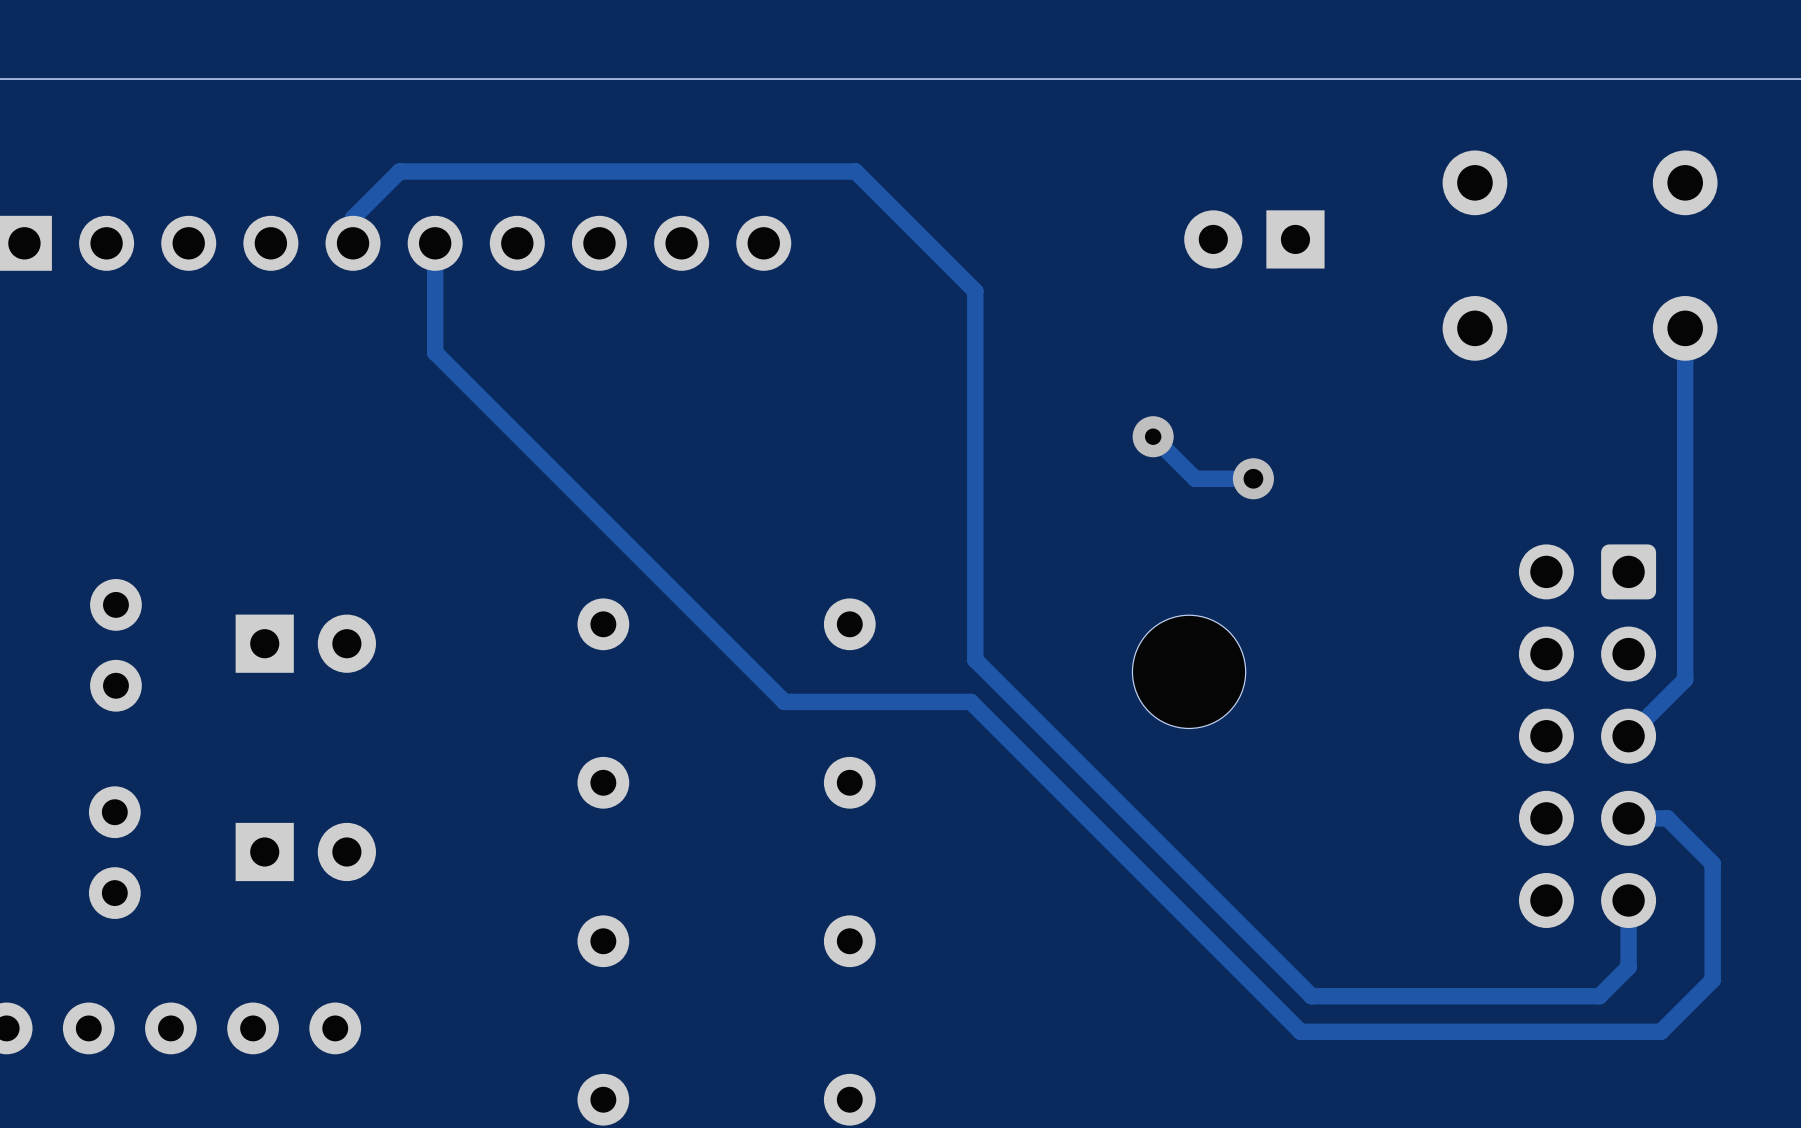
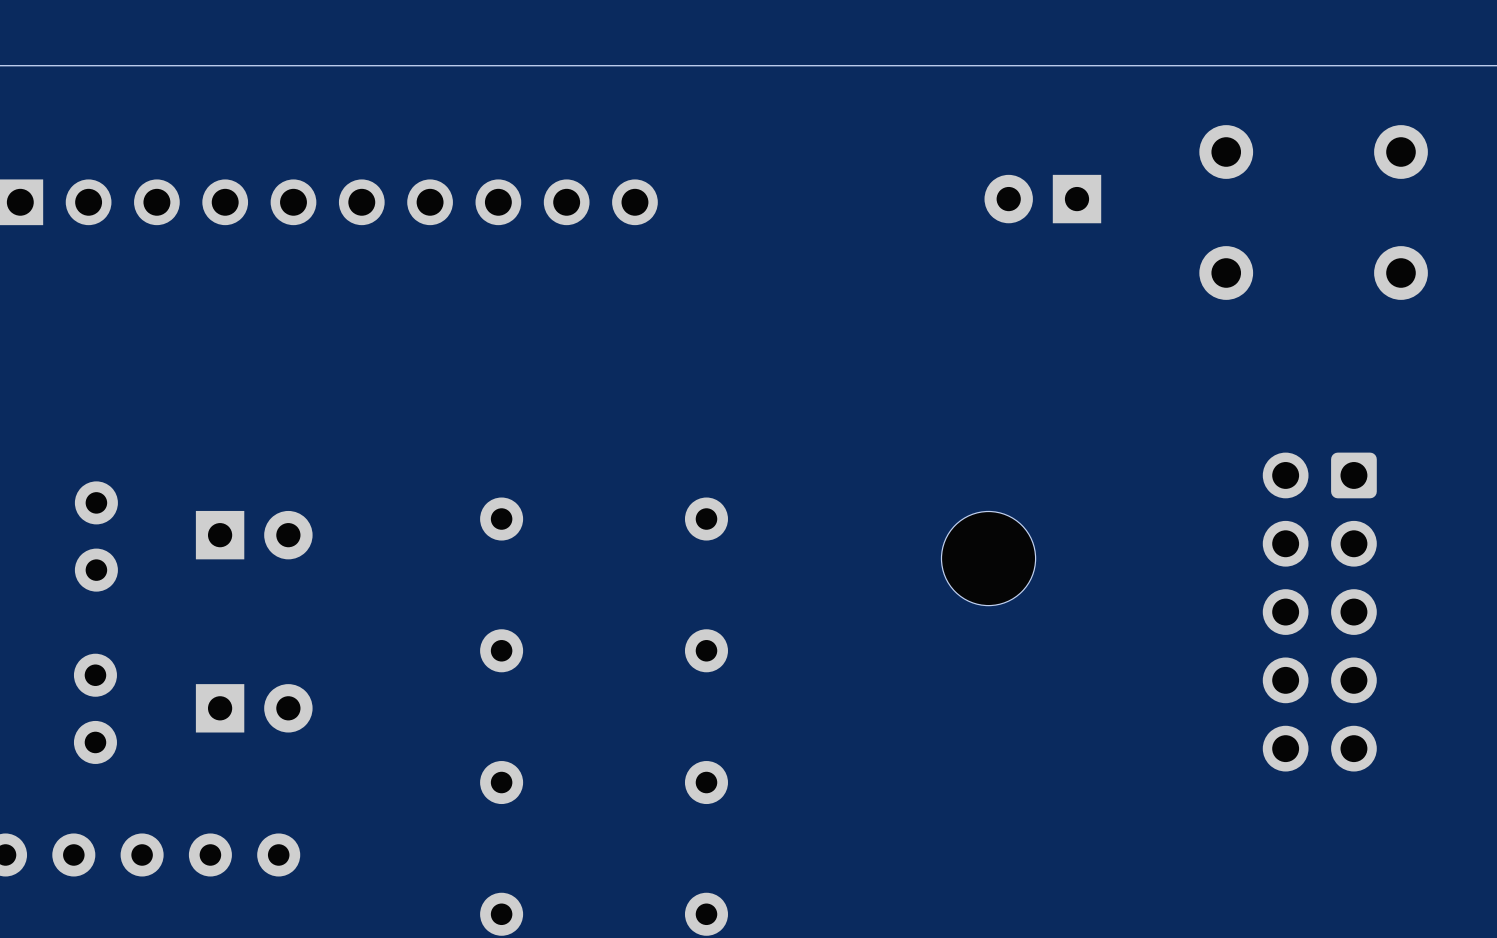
track: (353, 243) (353, 218) (399, 171) (855, 171) (975, 291) (975, 659) (1311, 996) (1599, 996) (1628, 967) (1628, 900) -> none
track: (435, 243) (435, 352) (784, 701) (970, 701) (1300, 1031) (1660, 1031) (1712, 980) (1712, 863) (1667, 818) (1628, 818) -> none
track: (1685, 328) (1685, 679) (1628, 736) -> none
track: (1153, 436) (1195, 478) (1253, 478) -> none
via: (1153, 436) -> none
via: (1253, 478) -> none

